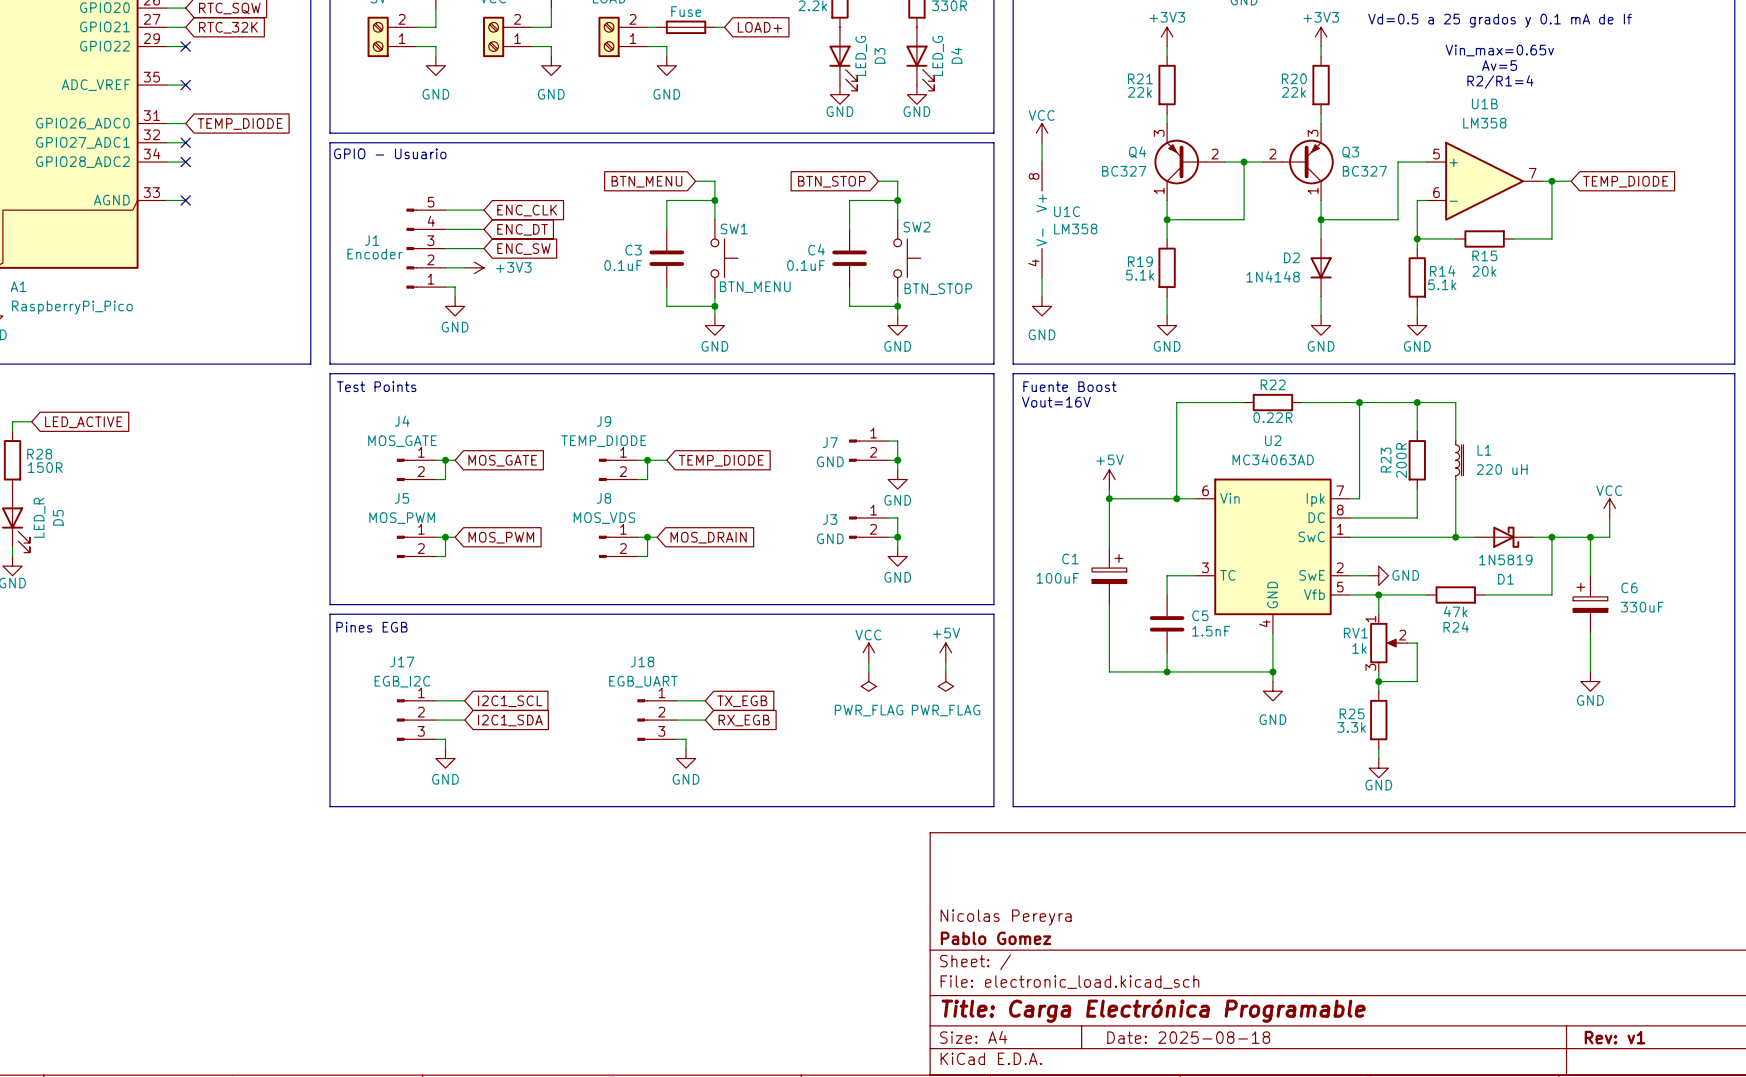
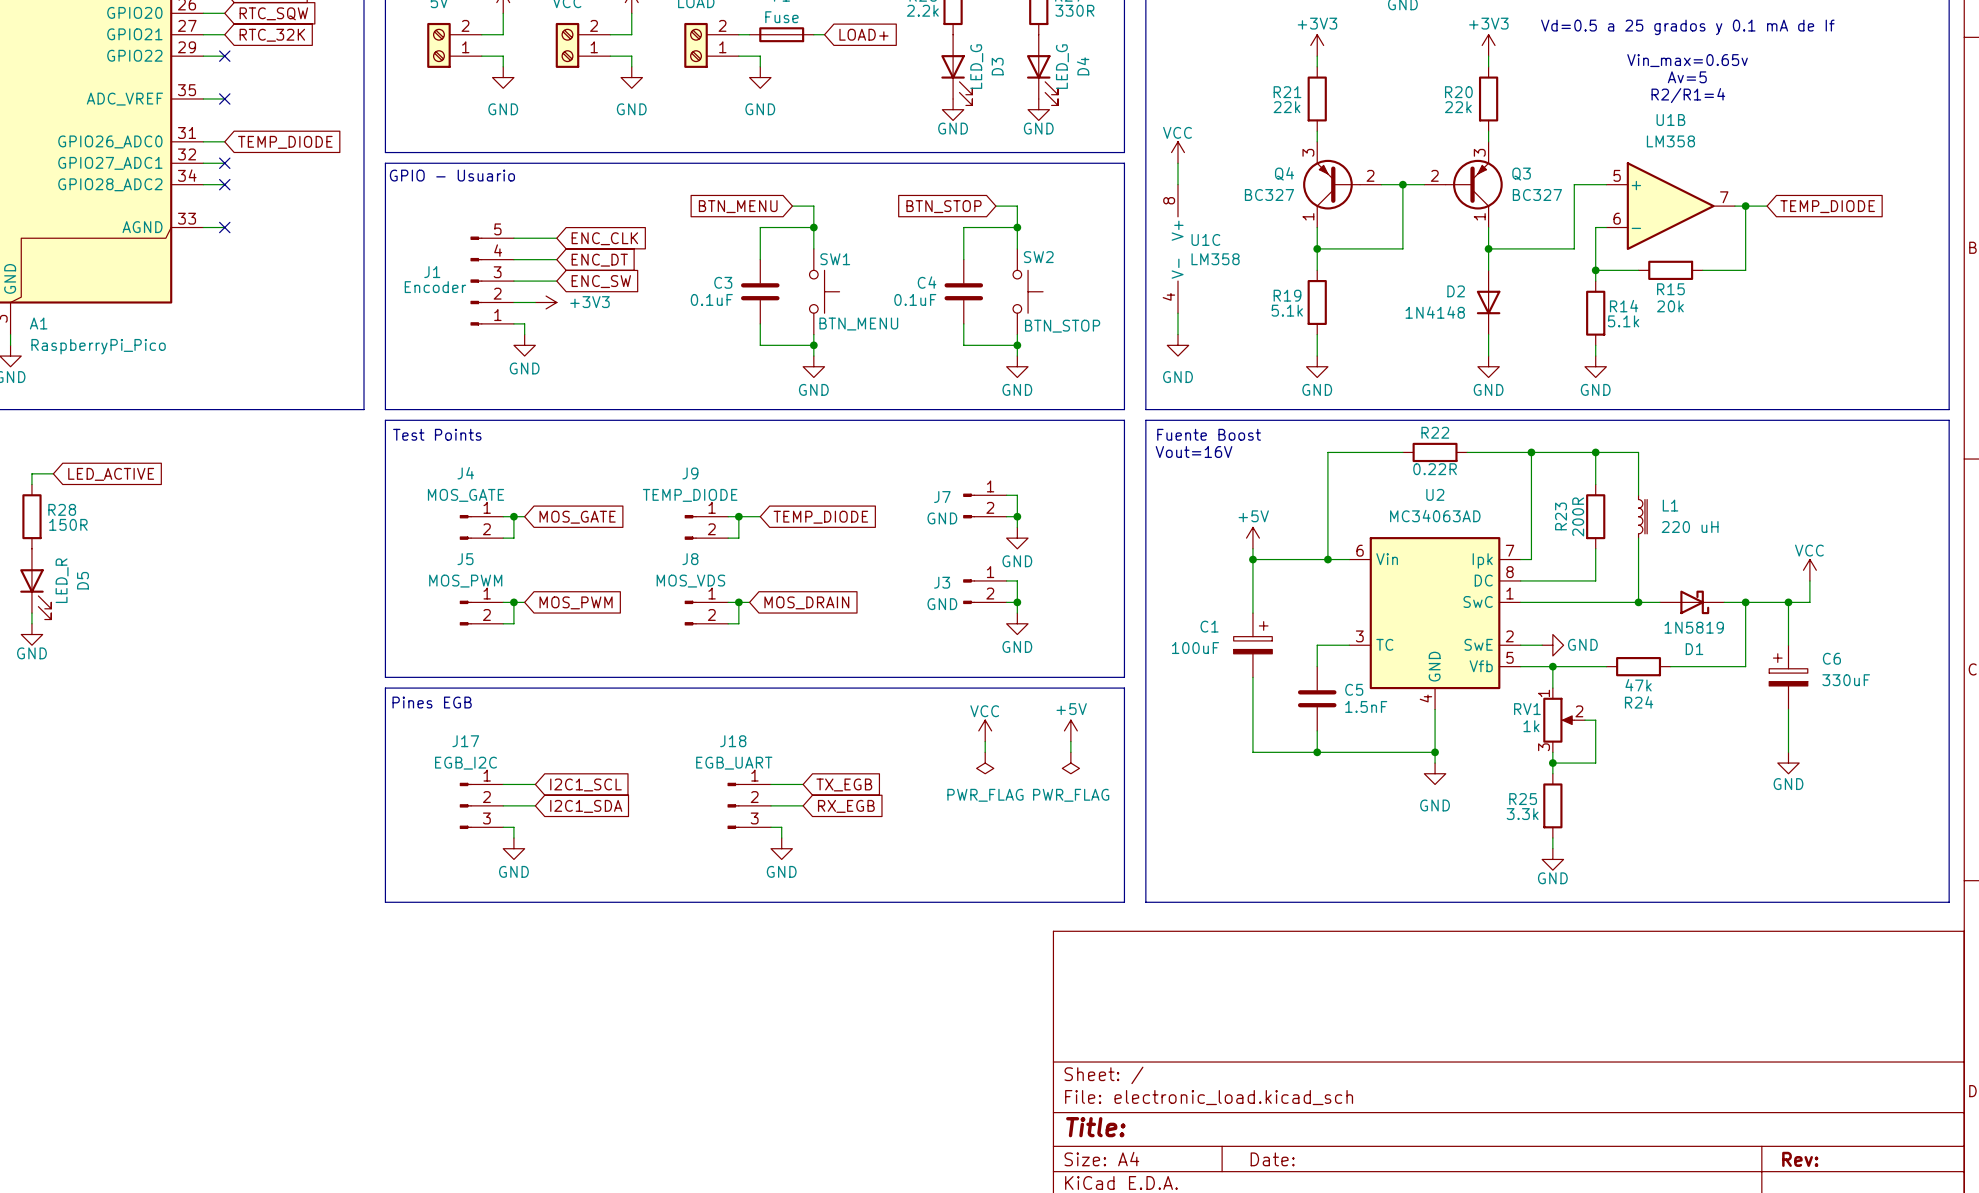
title block: Nicolas Pereyra (1006, 917) -> none
title block: Pablo Gomez (996, 938) -> none
title block: Title: Carga Electrónica Programable (1153, 1010) -> Title: (1095, 1127)
title block: Date: 2025-08-18 (1188, 1037) -> Date: (1272, 1159)
title block: Rev: v1 (1615, 1037) -> Rev: (1800, 1159)

